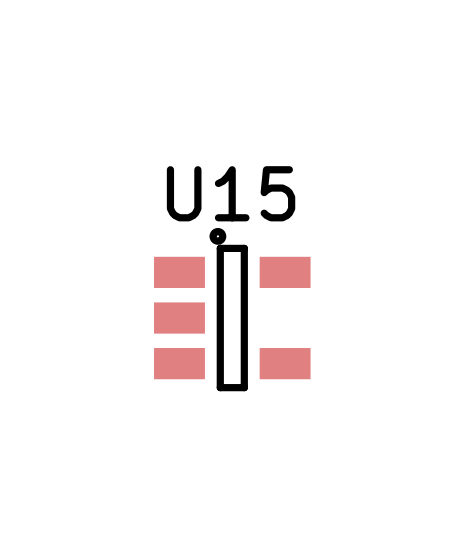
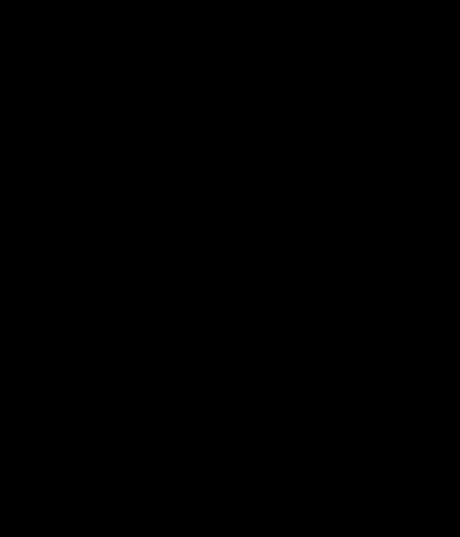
U15: (232, 309) -> none

